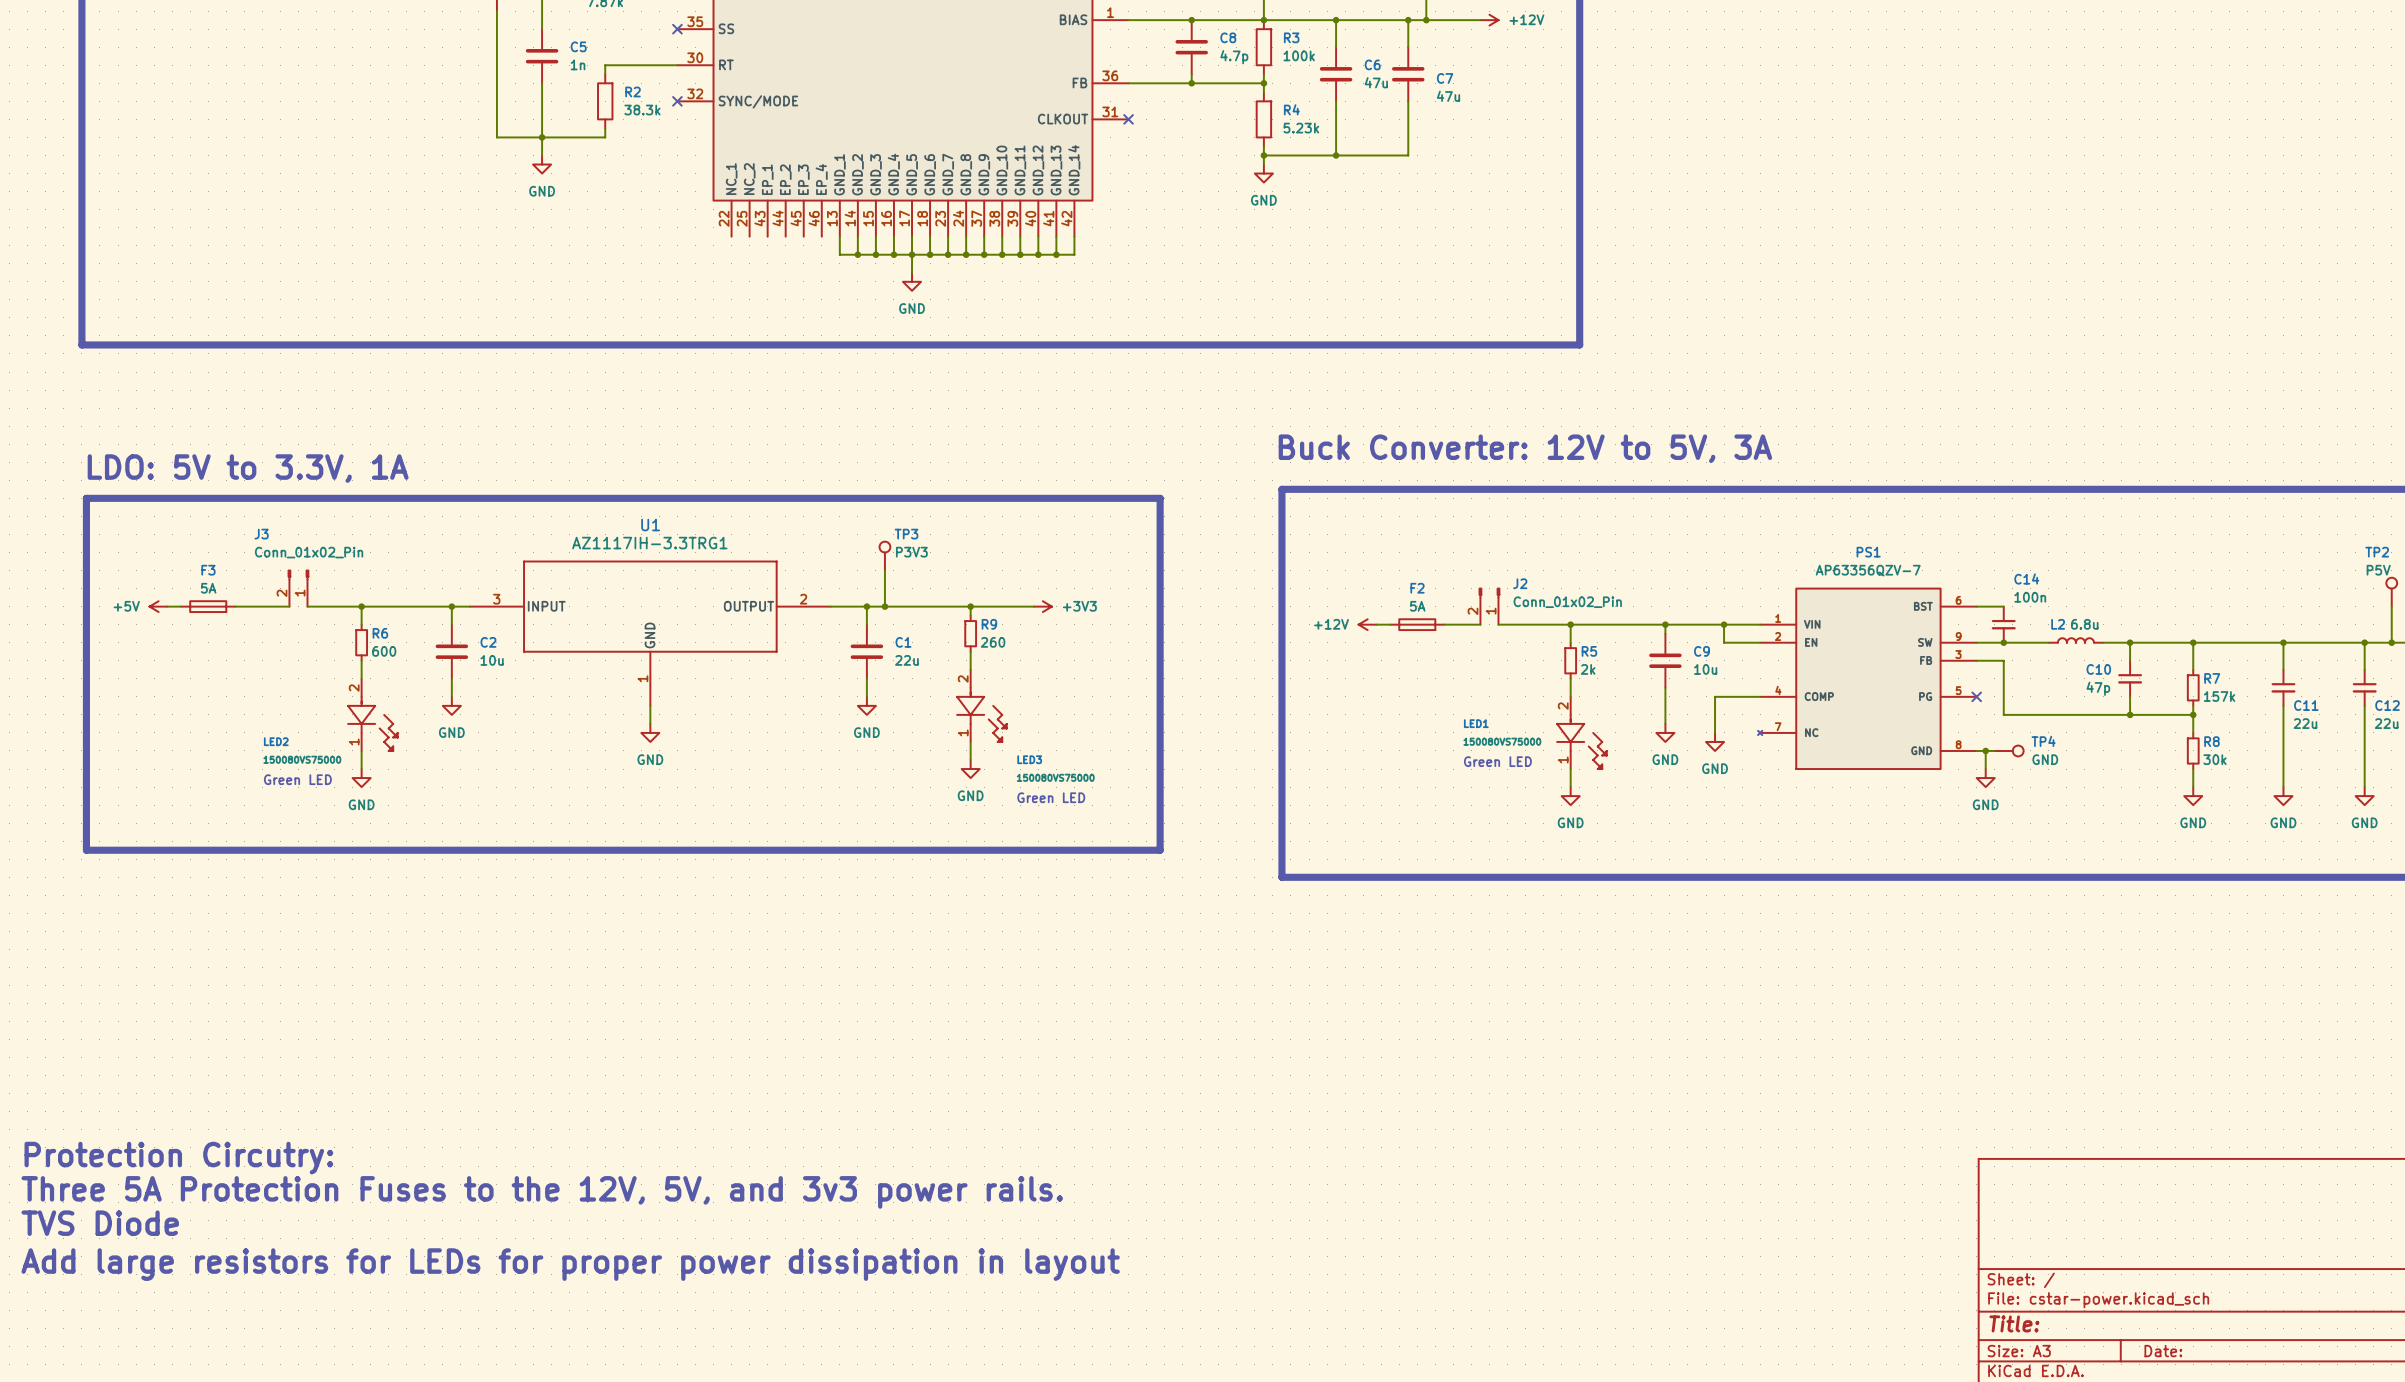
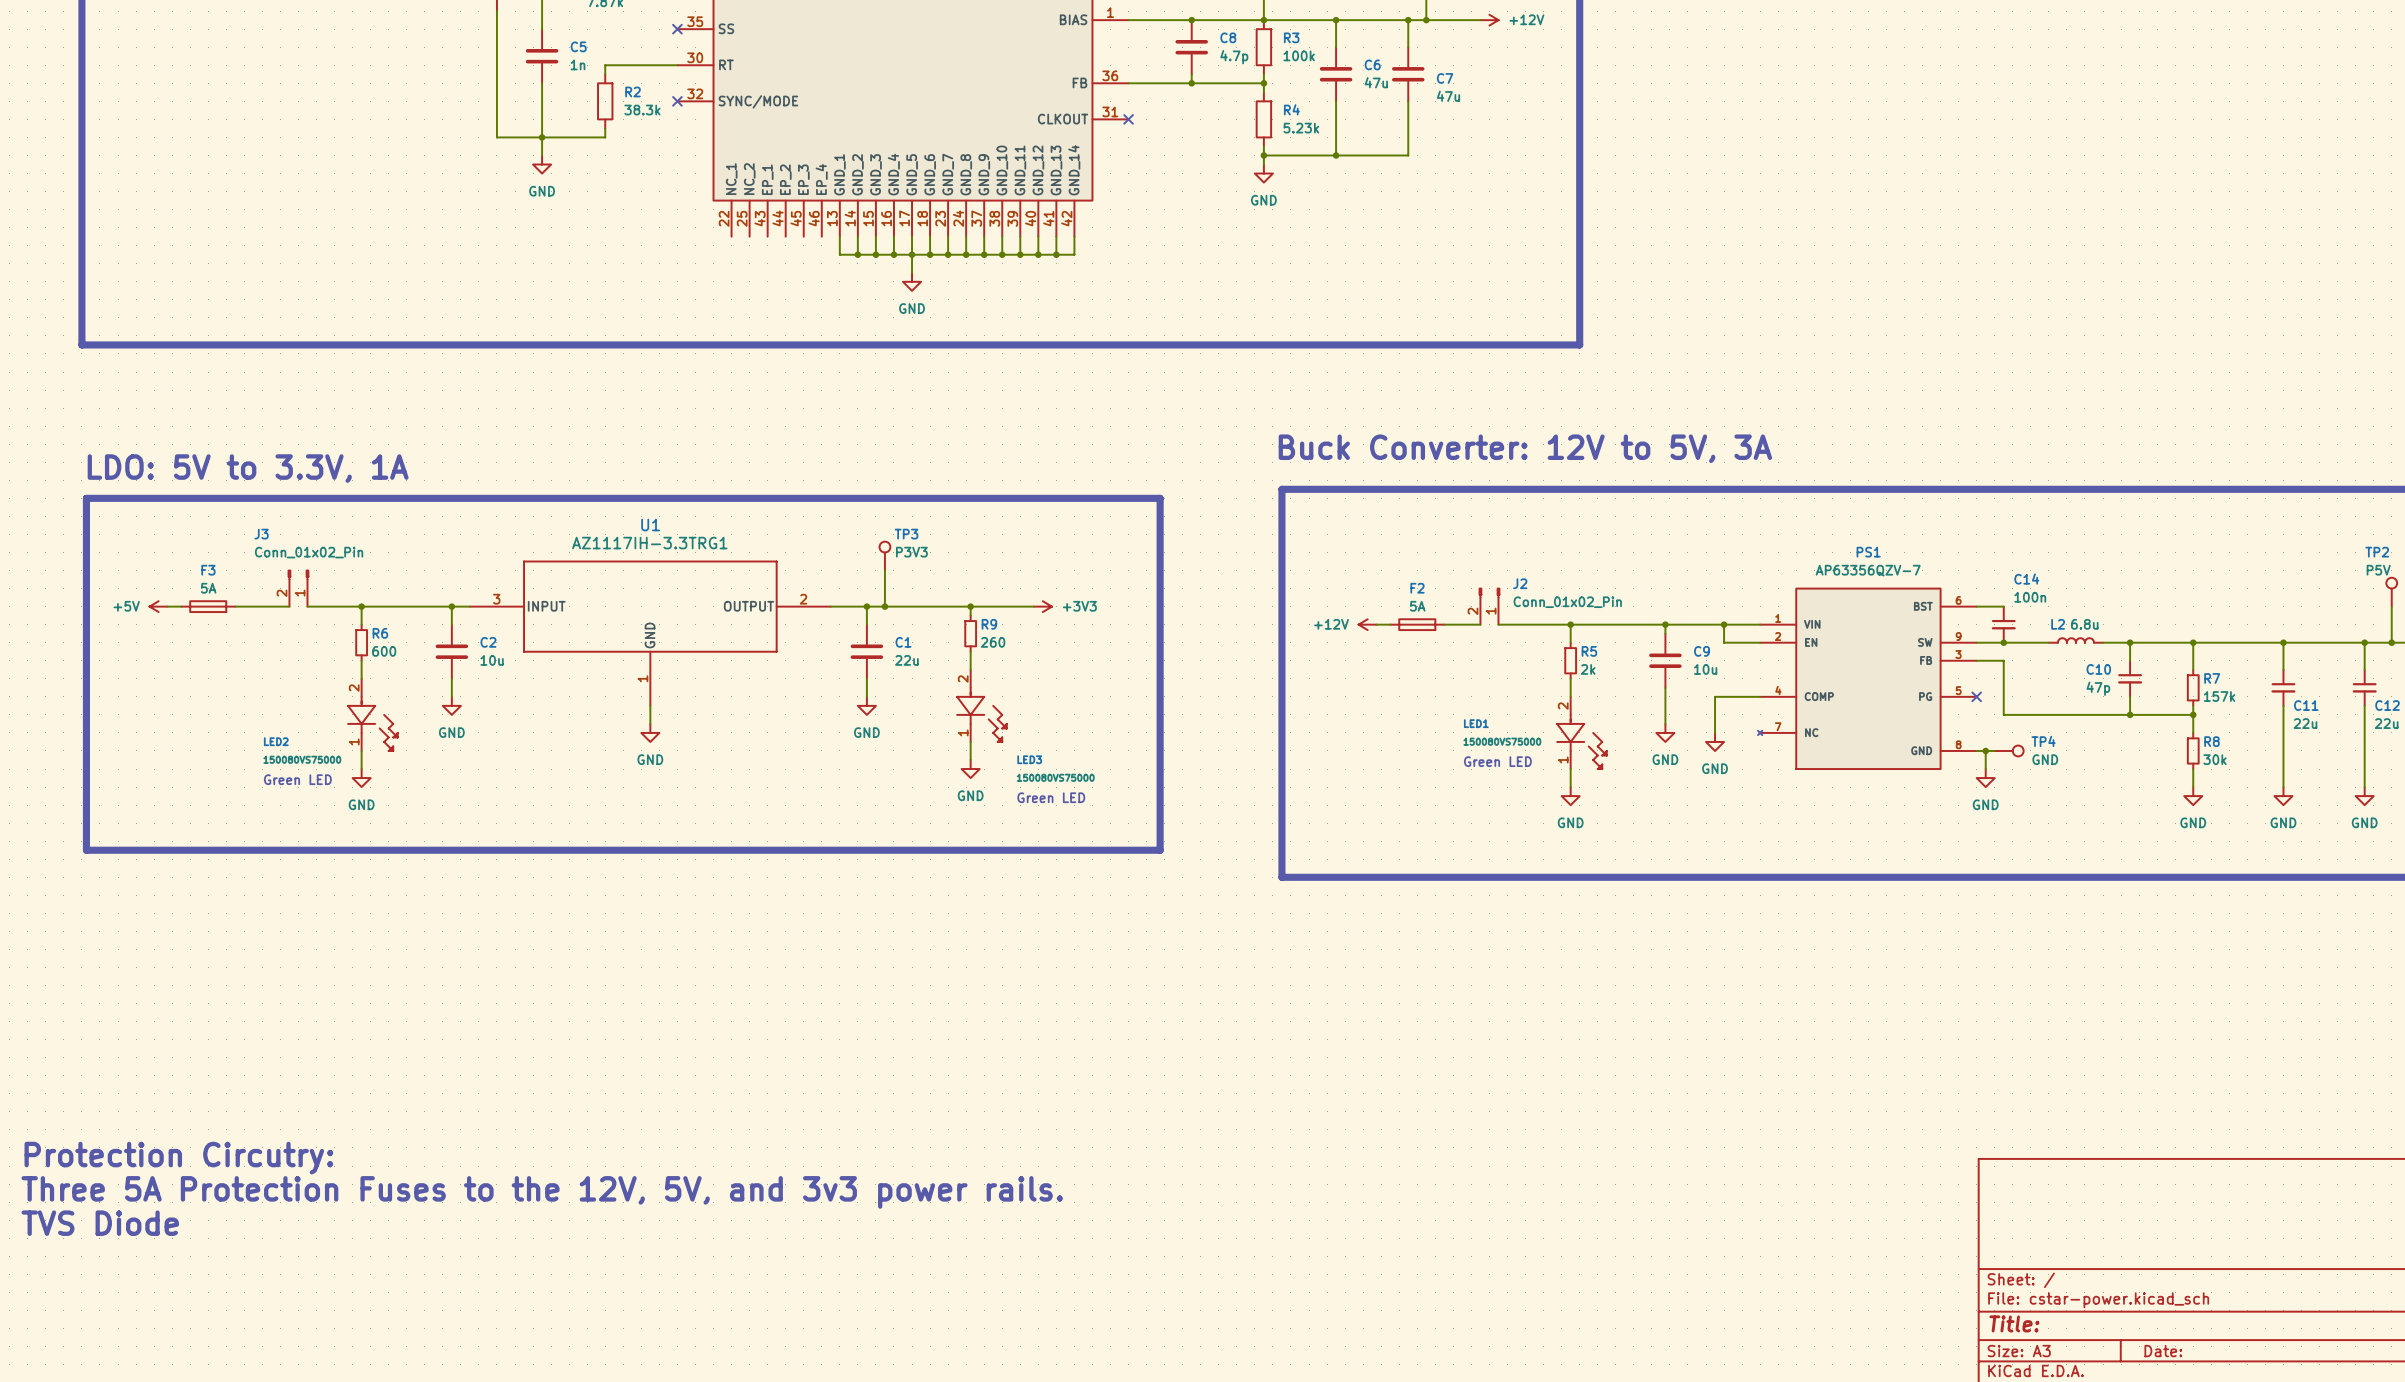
text: Add large resistors for LEDs for proper power dissipation in layout (570, 1264) -> none

